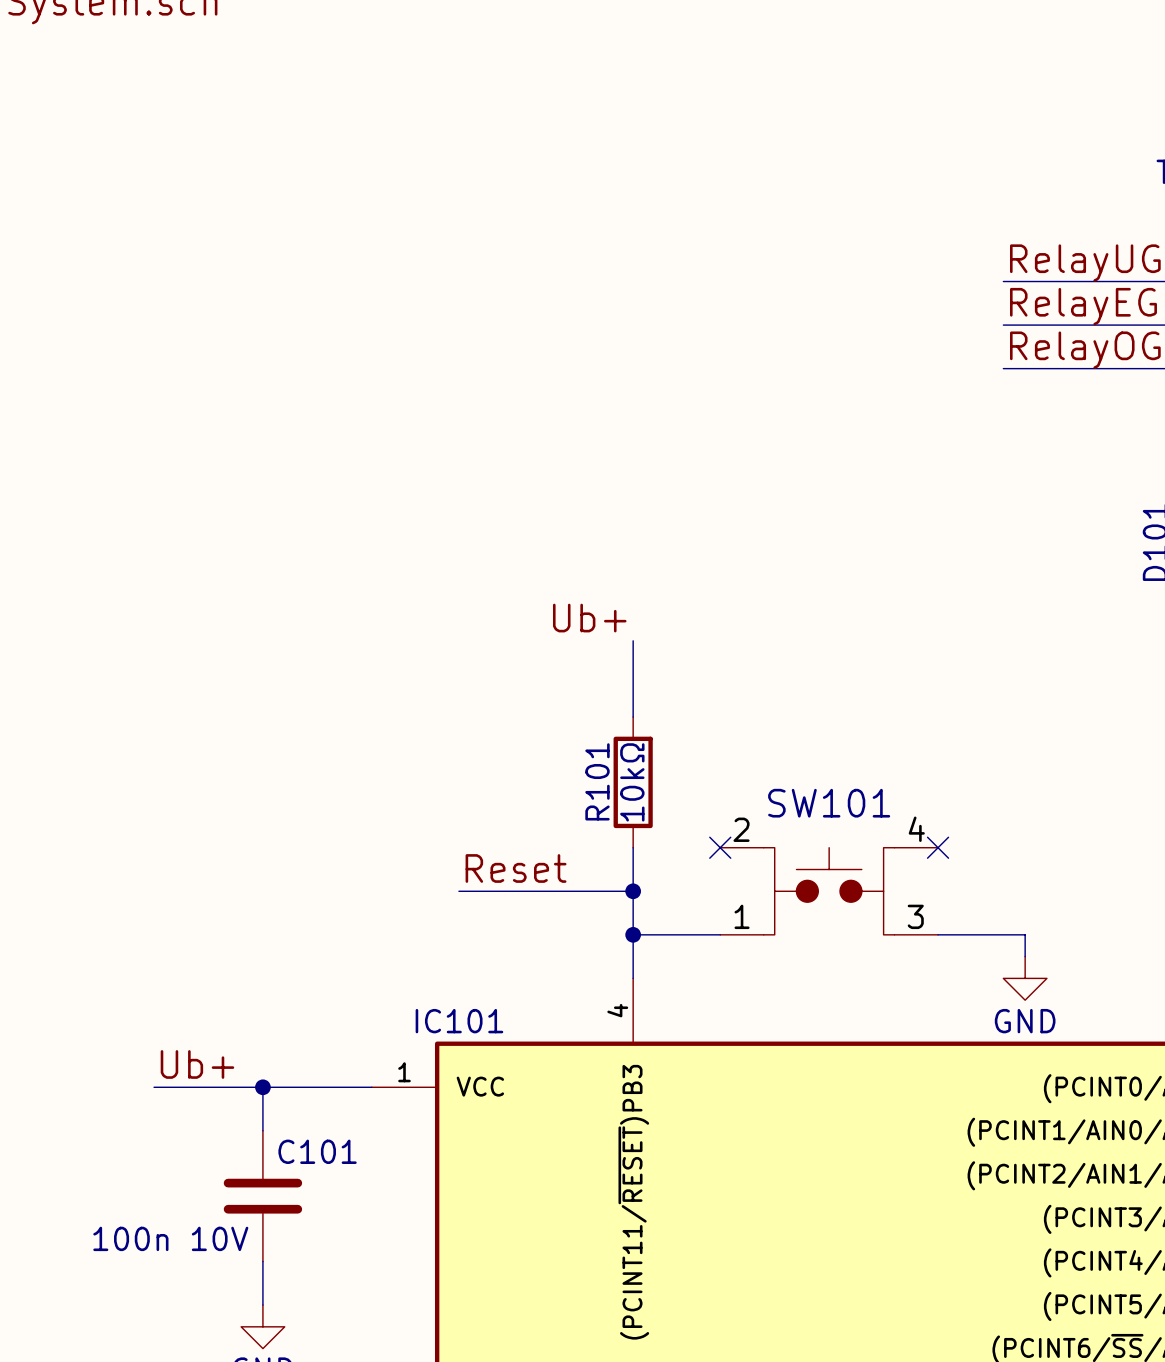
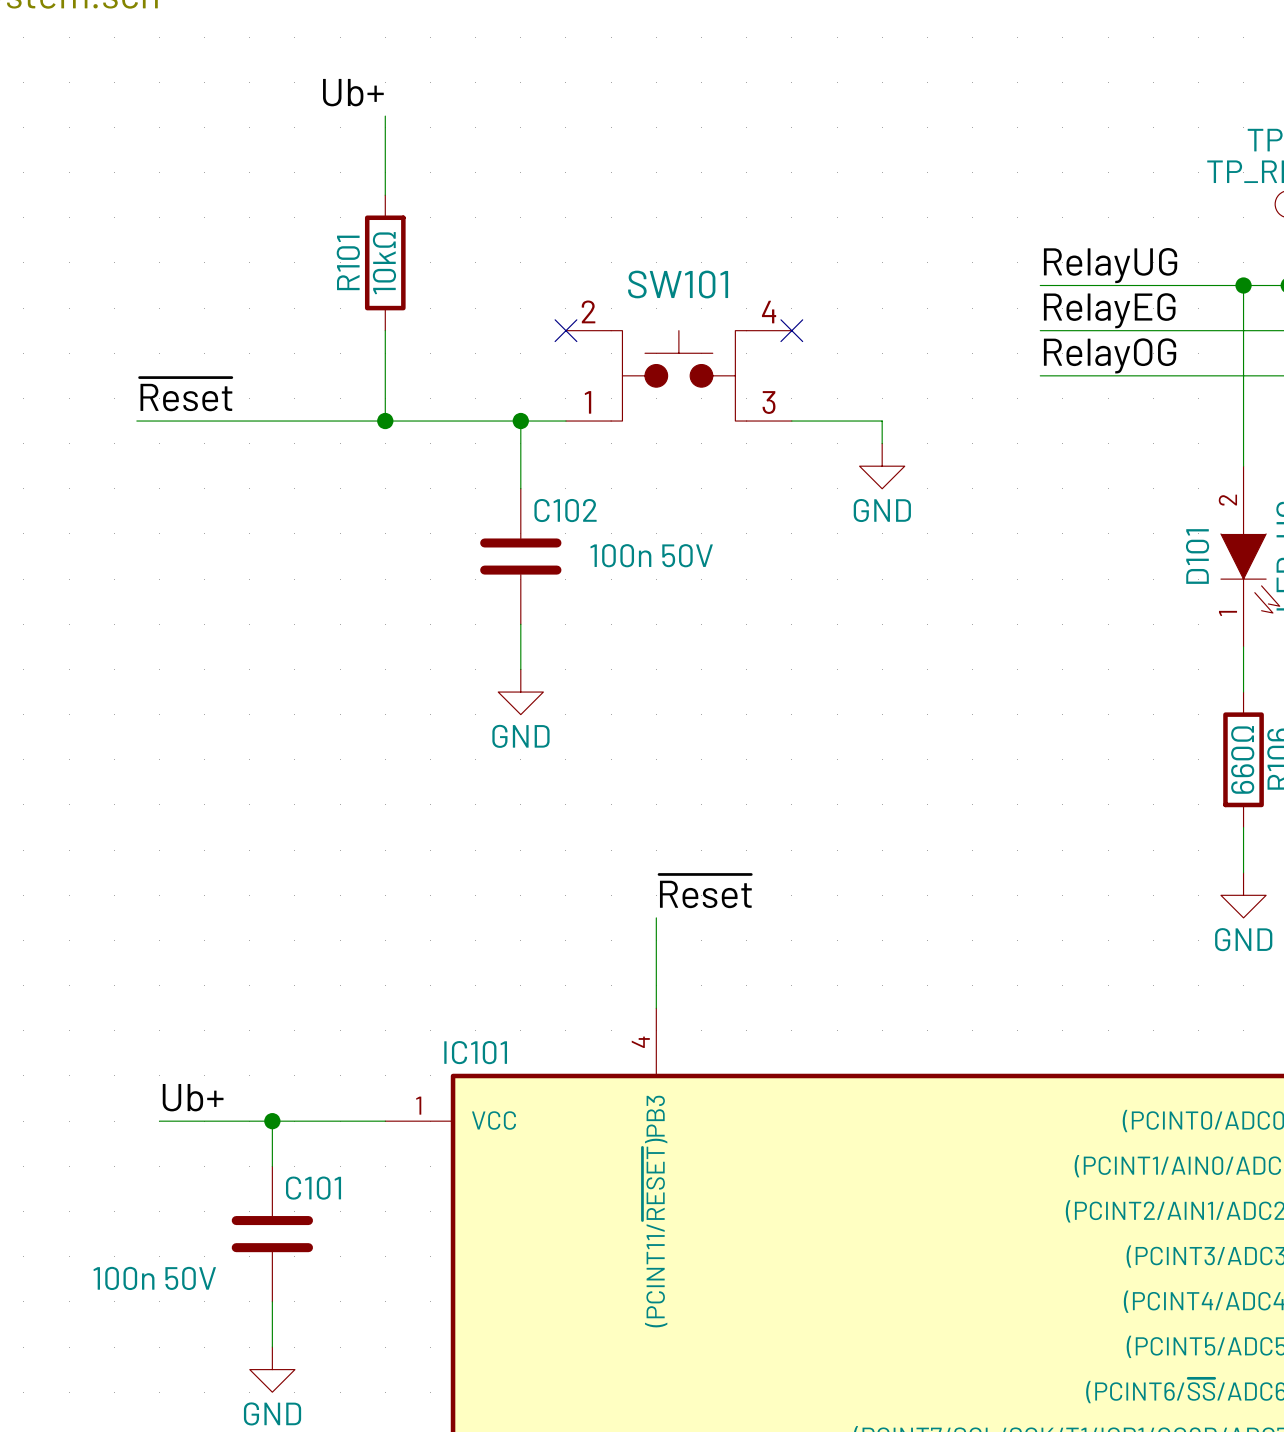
label: none -> Ub+ (353, 92)
wire: none -> (385, 116) (385, 195)
wire: none -> (385, 330) (385, 421)
no-connect mark: none -> (565, 330)
no-connect mark: none -> (791, 330)
label: none -> ~{Reset} (185, 394)
wire: none -> (136, 421) (565, 421)
junction: none -> (385, 421)
wire: none -> (520, 421) (520, 488)
junction: none -> (520, 421)
wire: none -> (791, 421) (882, 421) (882, 443)
power symbol: none -> GND (882, 466)
C102: none -> 100n 50V (520, 556)
wire: none -> (520, 624) (520, 669)
label: Ub+ (589, 618) -> none
wire: (633, 640) (633, 717) -> none
power symbol: none -> GND (520, 692)
R101 position: (633, 782) -> (385, 262)
wire: (633, 847) (633, 891) (458, 891) -> none
no-connect mark: (720, 847) -> none
no-connect mark: (938, 847) -> none
label: none -> ~{Reset} (705, 891)
label: Reset (516, 868) -> none
junction: (633, 891) -> none
SW101 position: (829, 891) -> (678, 375)
wire: (633, 934) (720, 934) -> none
junction: (633, 934) -> none
wire: (938, 934) (1025, 934) (1025, 956) -> none
power symbol: GND (1025, 978) -> none
C101 value: 100n 10V (170, 1238) -> 100n 50V (154, 1278)

